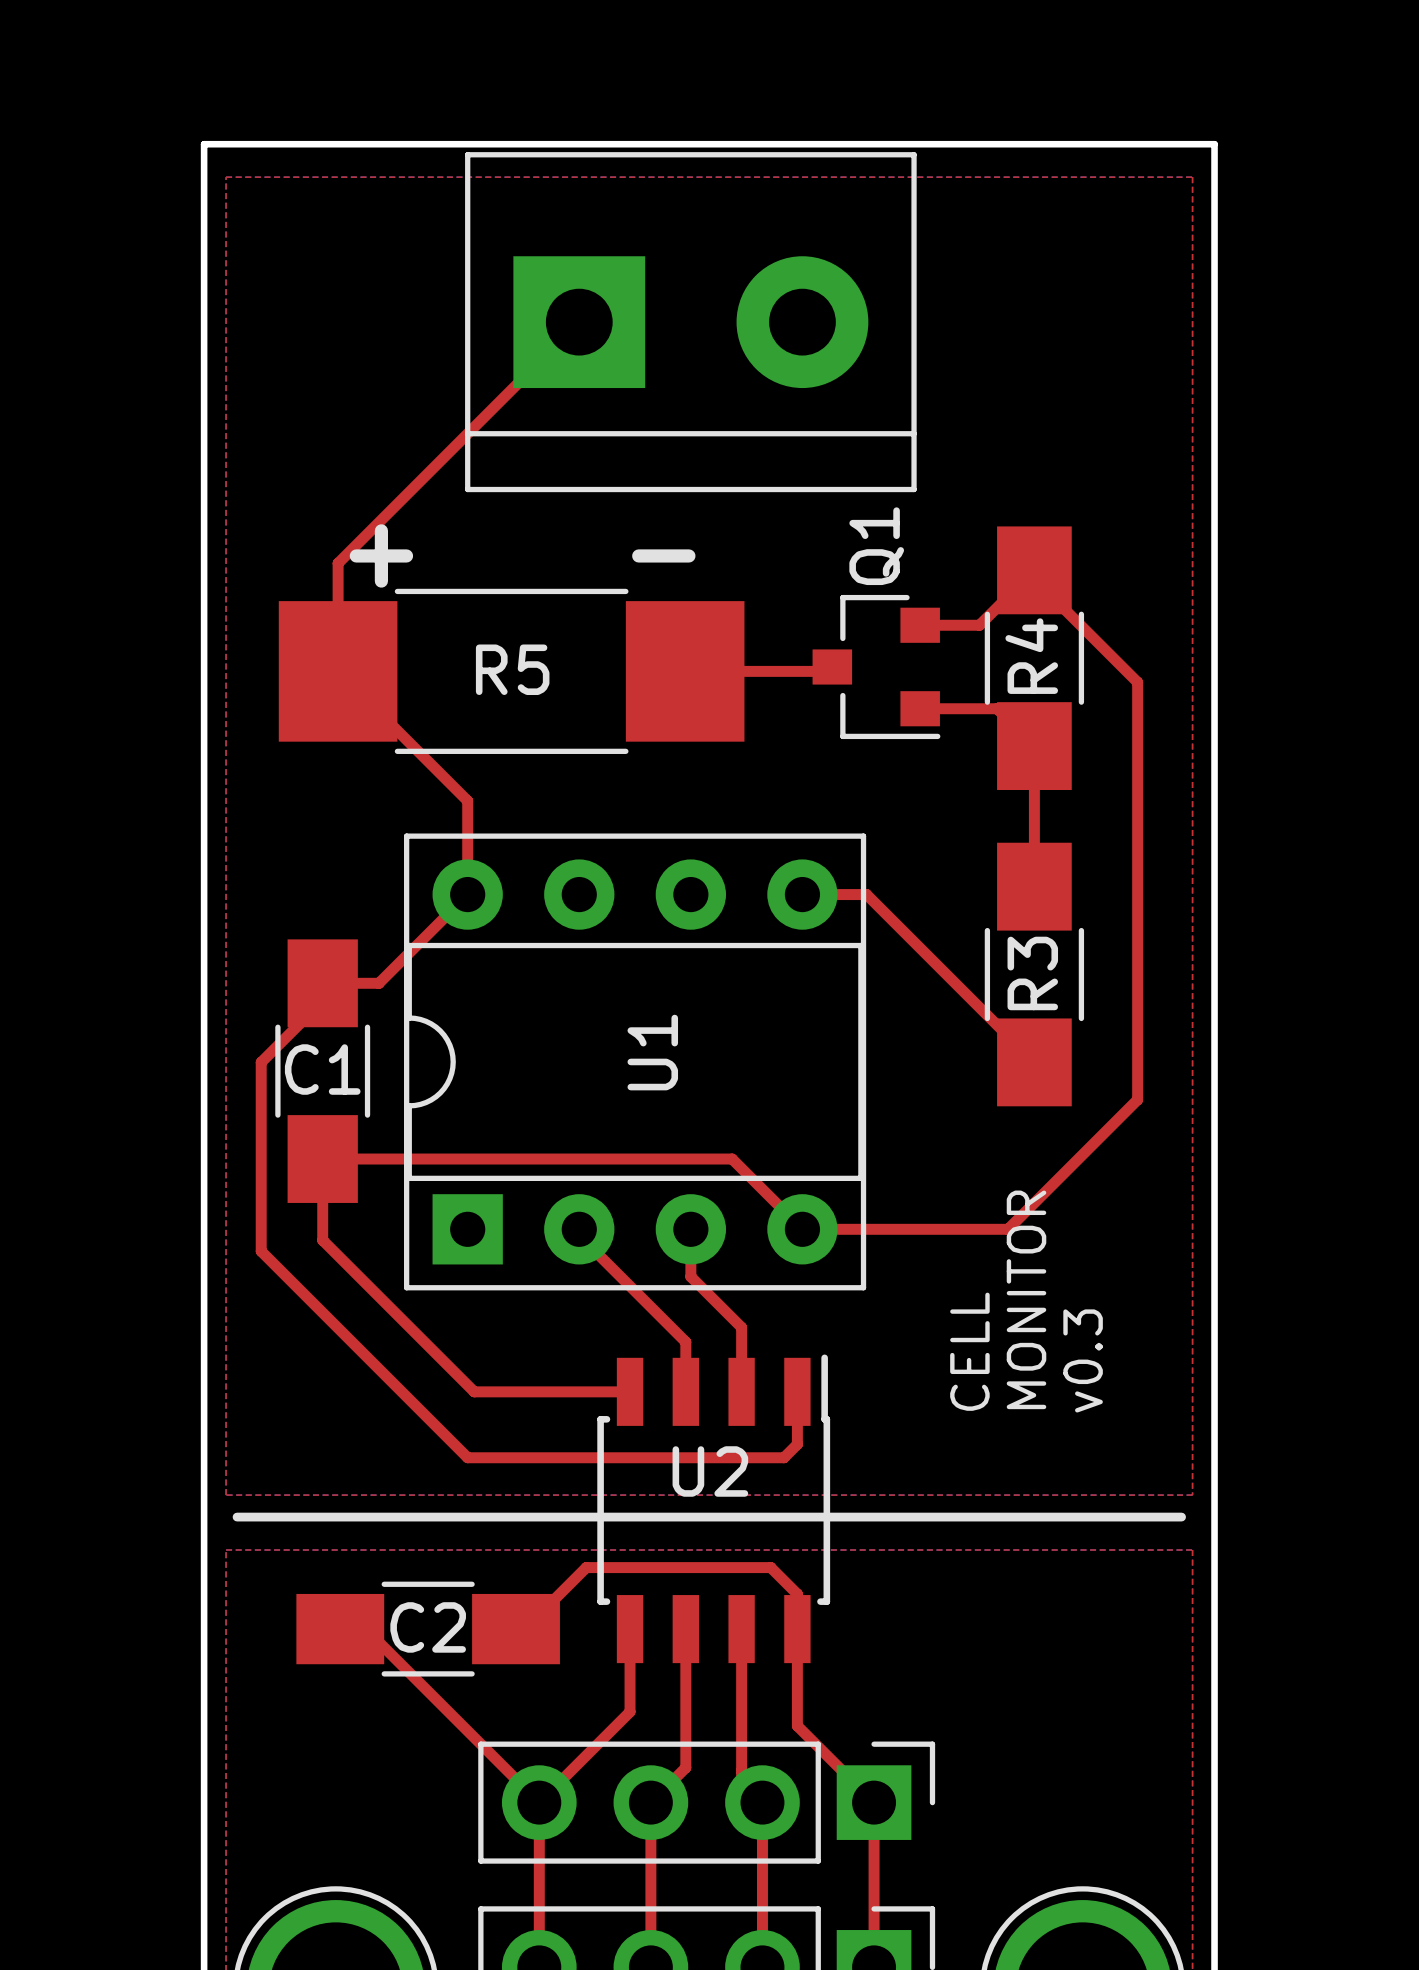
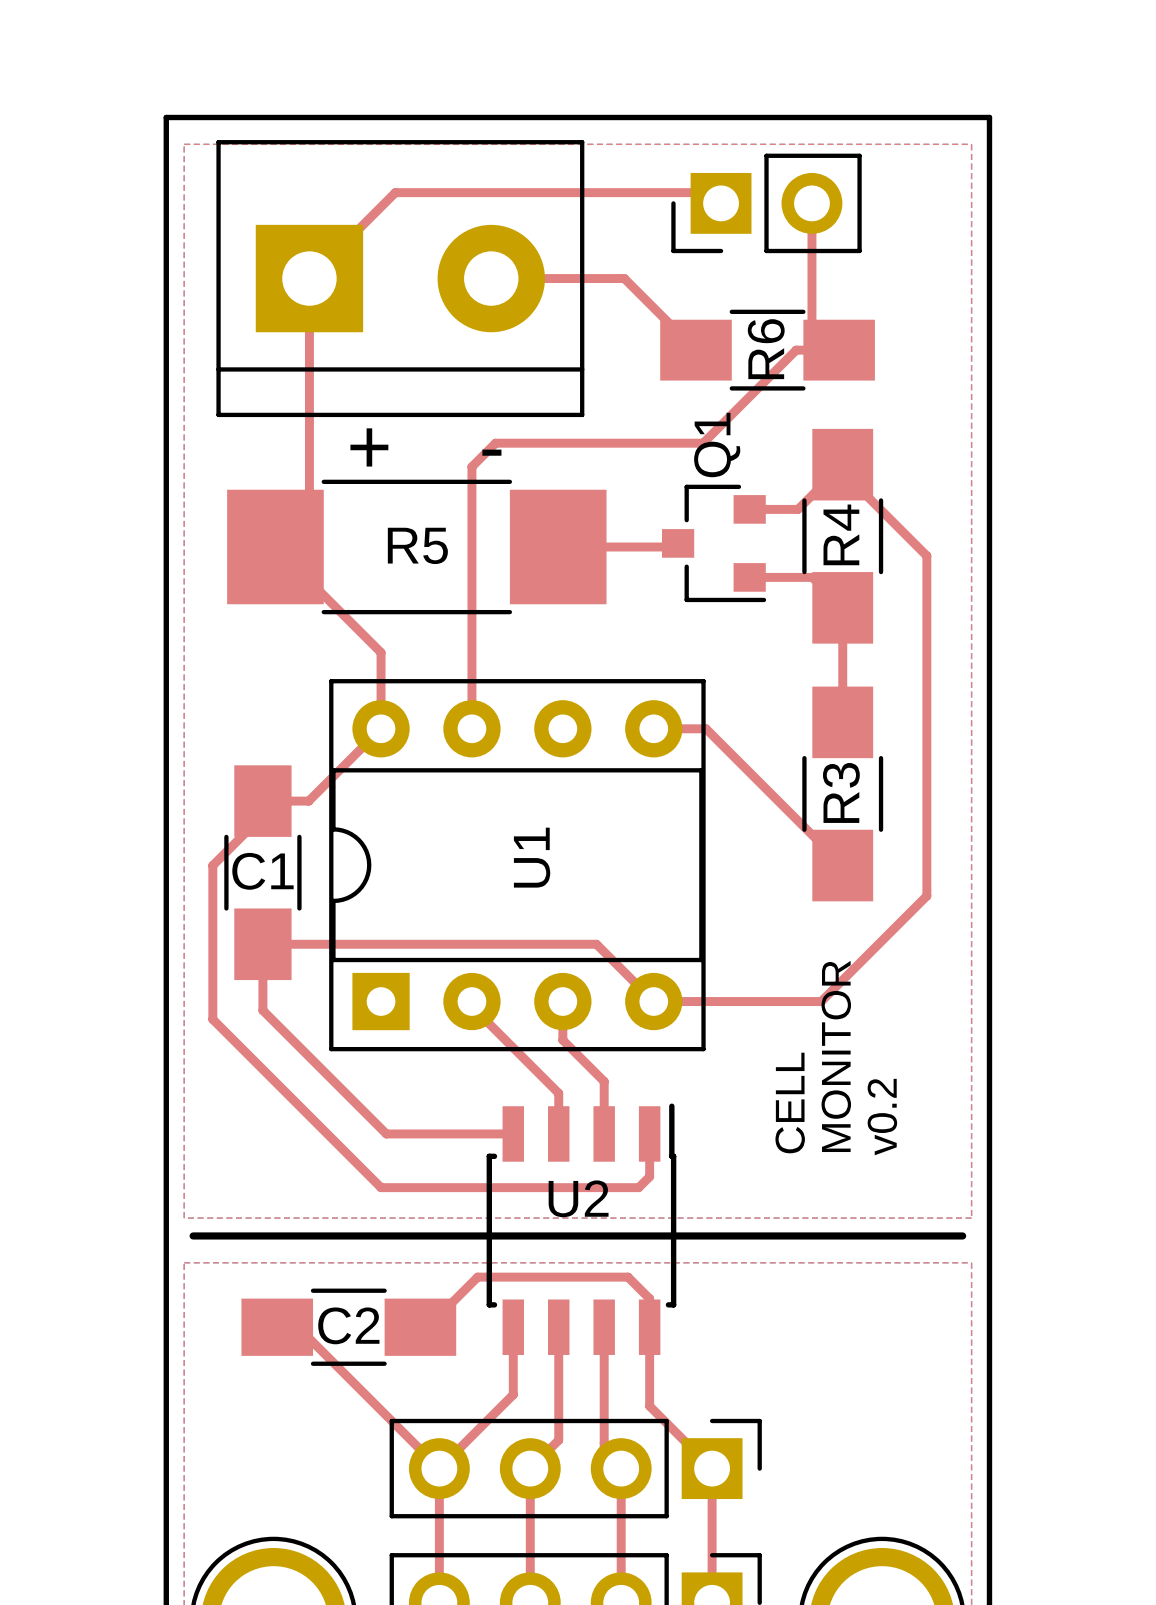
top track: none -> (721, 203) (710, 192) (395, 192) (275, 312)
part: none -> (766, 203)
top track: none -> (811, 203) (811, 322) (839, 350) (796, 350) (703, 443) (495, 443) (471, 466) (471, 728)
top track: none -> (309, 260) (309, 512)
top track: (579, 322) (338, 563) (338, 671) -> none
part position: (690, 322) -> (400, 278)
top track: none -> (491, 278) (624, 278) (696, 350)
R6: none -> (767, 350)
text: v0.3 (1083, 1360) -> v0.2 (882, 1117)

